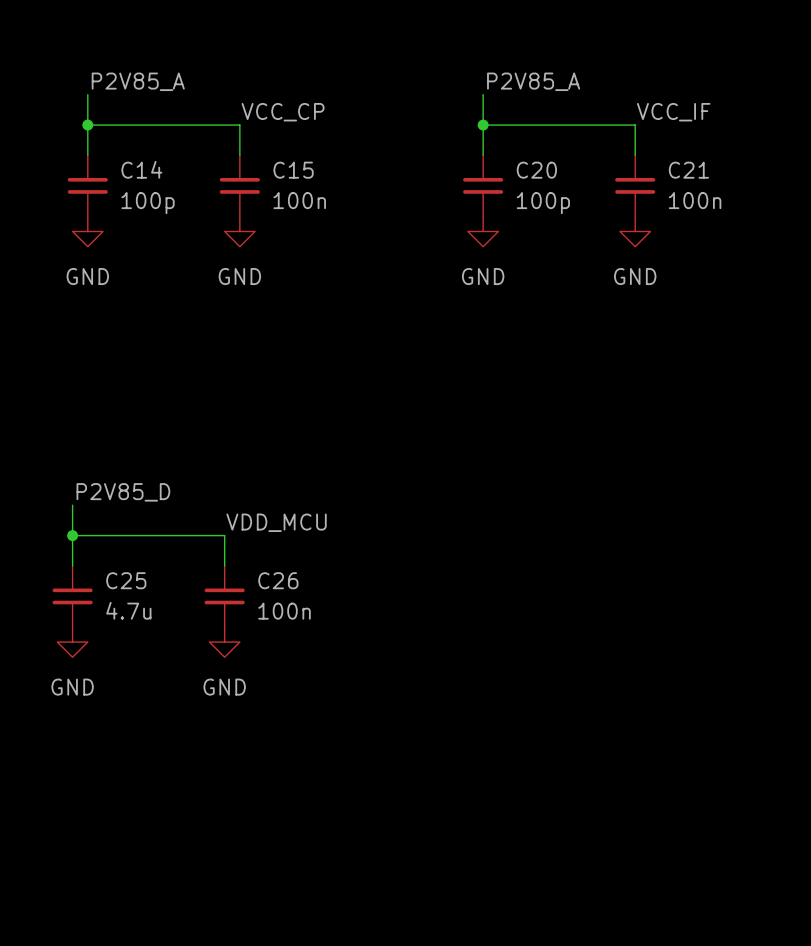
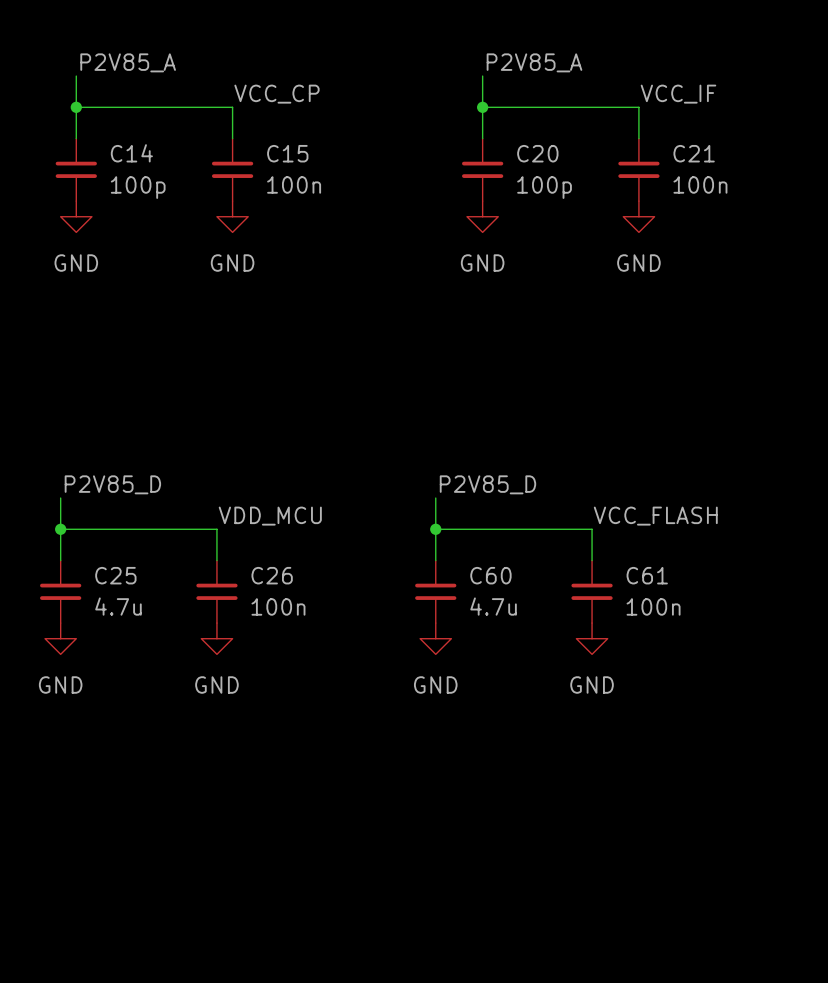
label: none -> P2V85_D (487, 484)
wire: none -> (435, 498) (435, 560)
label: none -> VCC_FLASH (655, 516)
wire: none -> (435, 529) (592, 529) (592, 560)
junction: none -> (435, 529)
C60: none -> 4.7u (435, 591)
C61: none -> 100n (592, 591)
power symbol: none -> GND (435, 638)
power symbol: none -> GND (592, 638)

